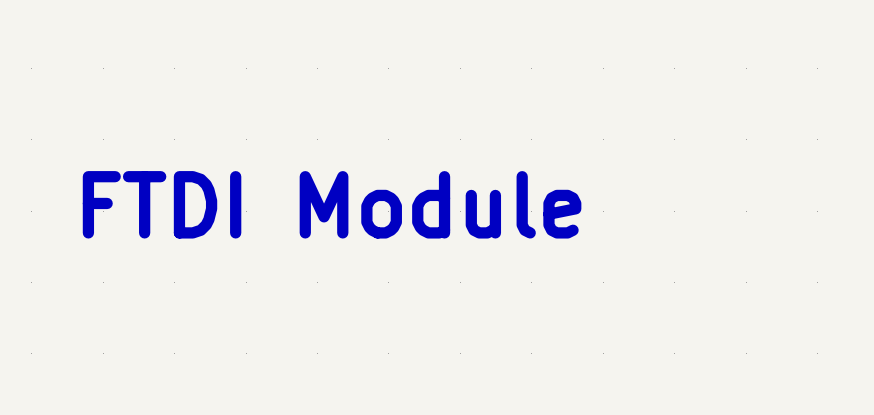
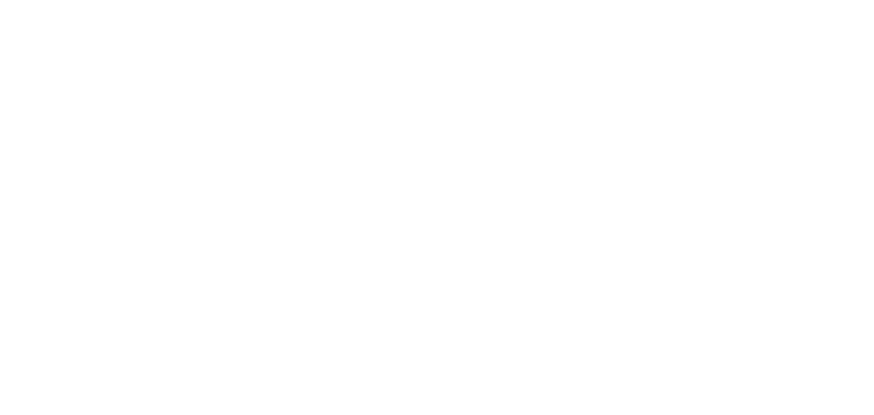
text: FTDI Module (332, 204) -> none

